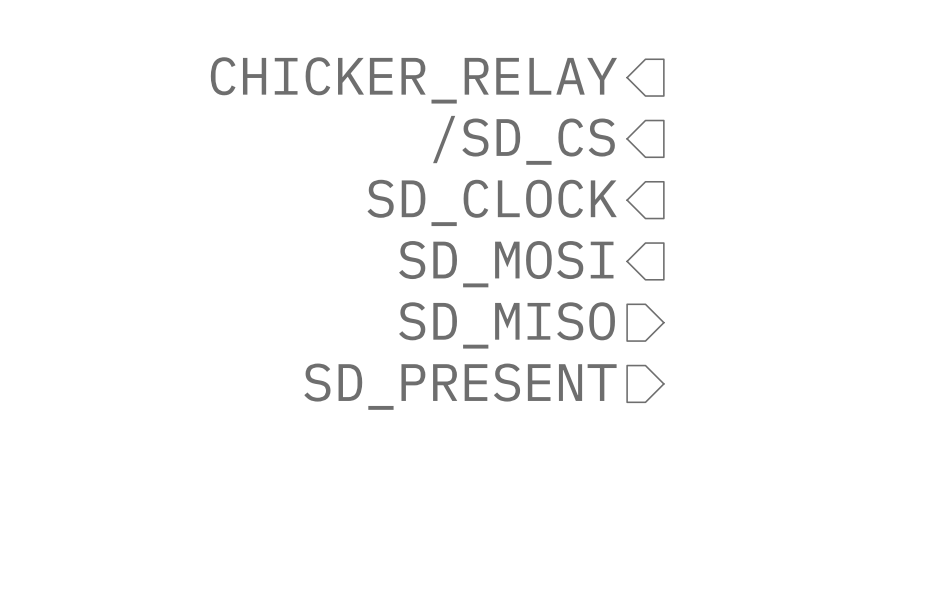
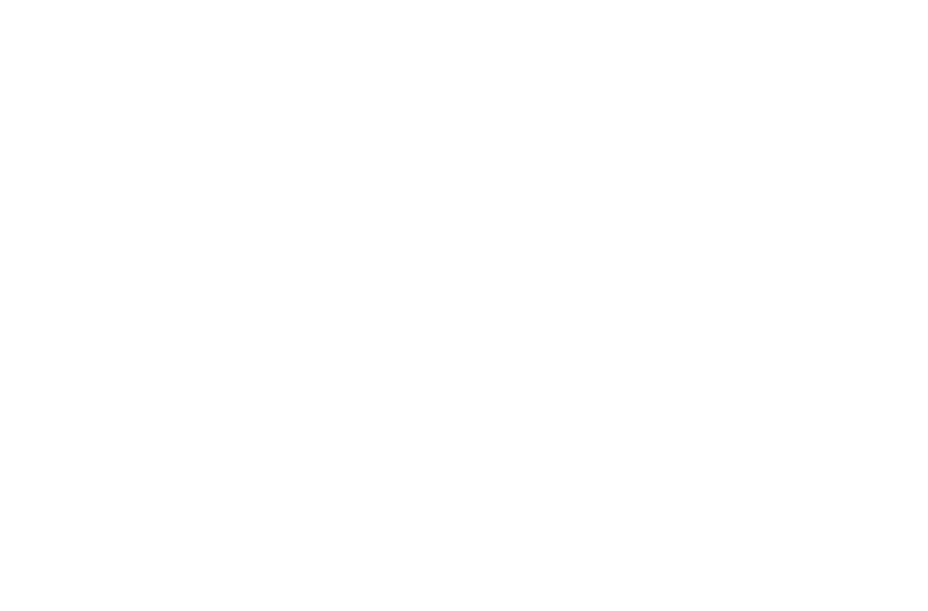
hierarchical label: CHICKER_RELAY (413, 80) -> none
hierarchical label: /SD_CS (523, 140) -> none
hierarchical label: SD_CLOCK (492, 202) -> none
hierarchical label: SD_MOSI (506, 264) -> none
hierarchical label: SD_MISO (507, 325) -> none
hierarchical label: SD_PRESENT (460, 386) -> none

